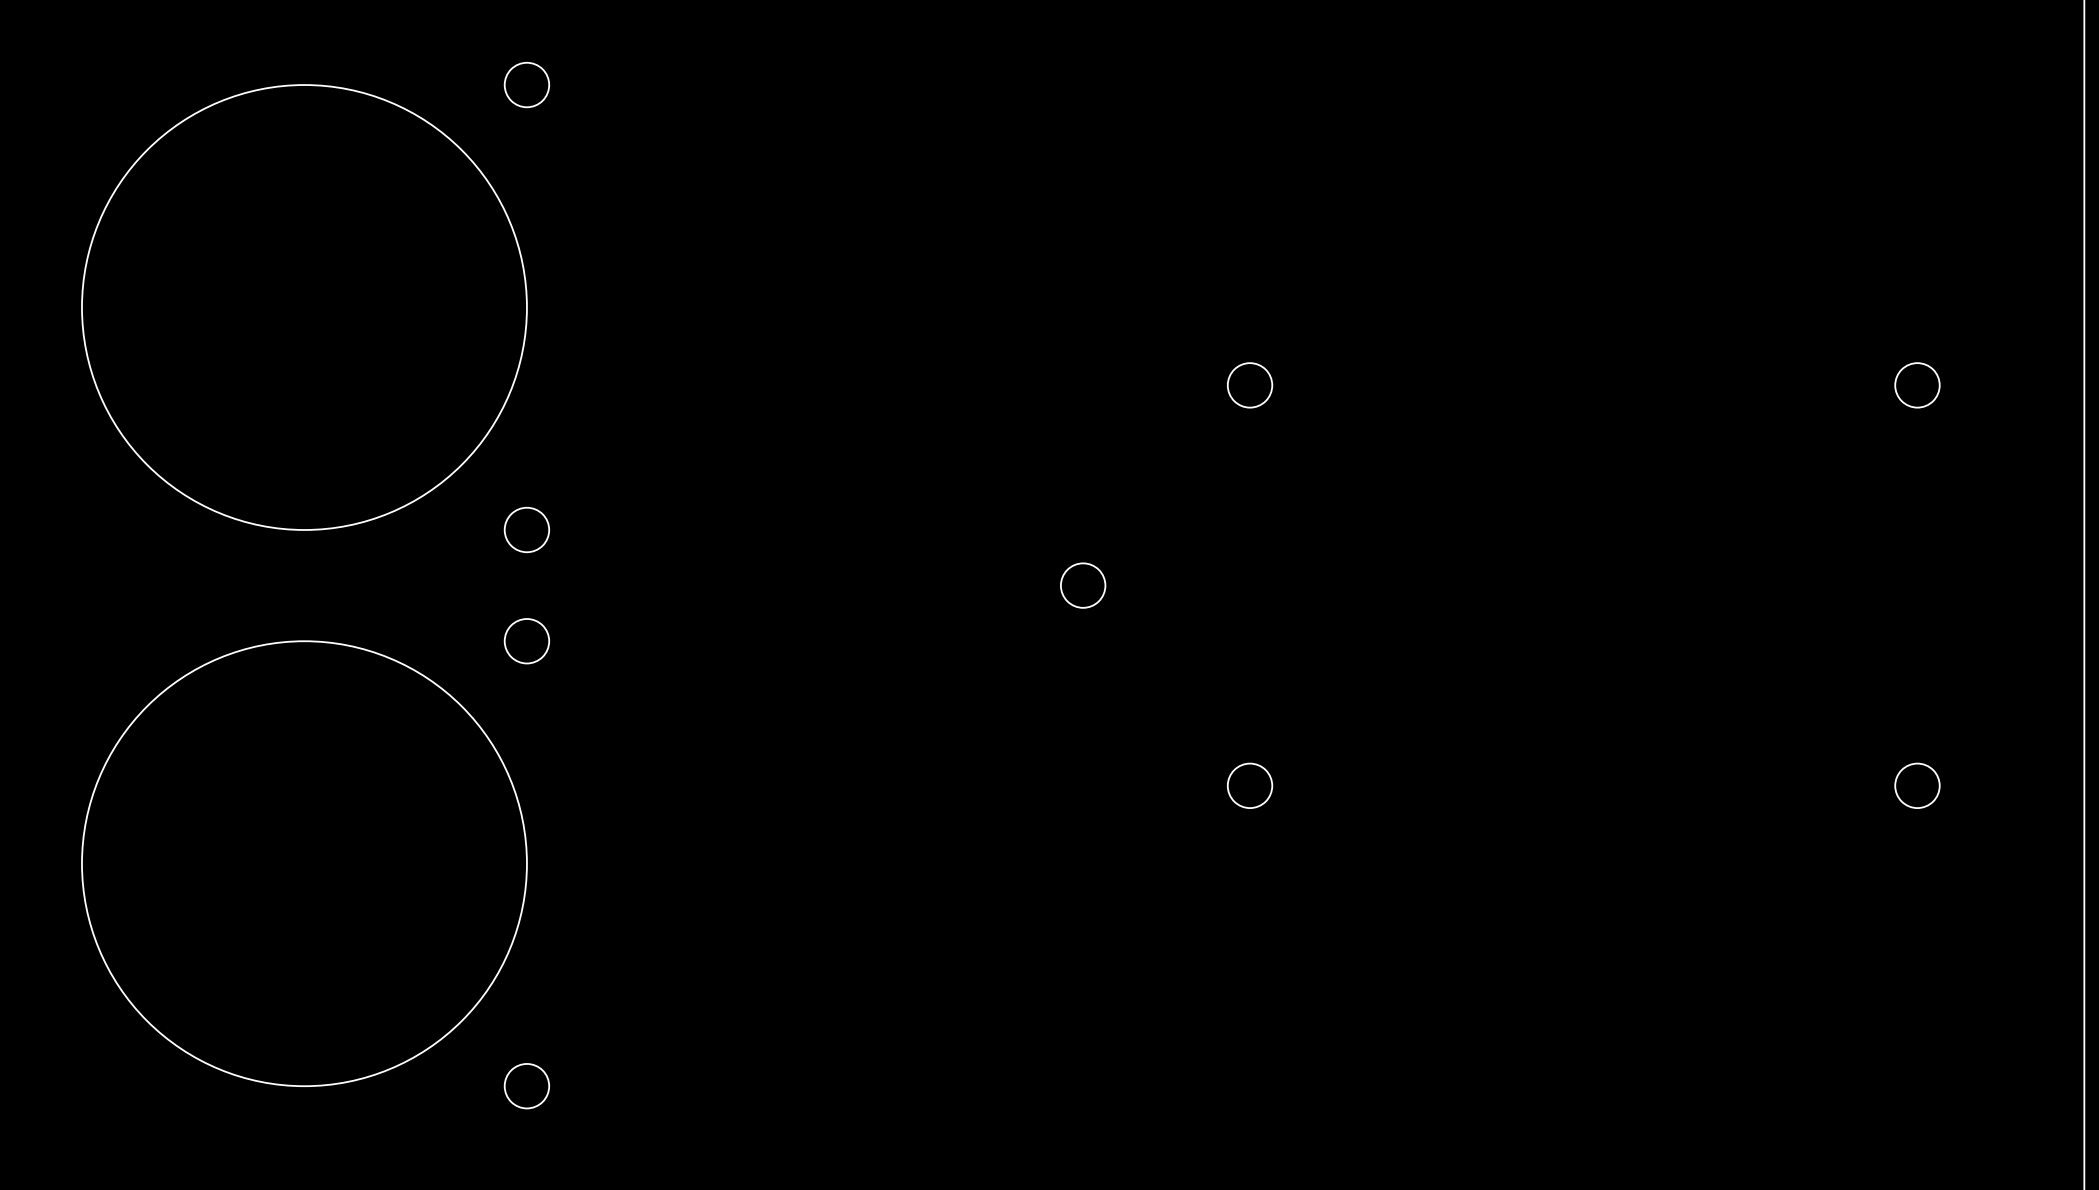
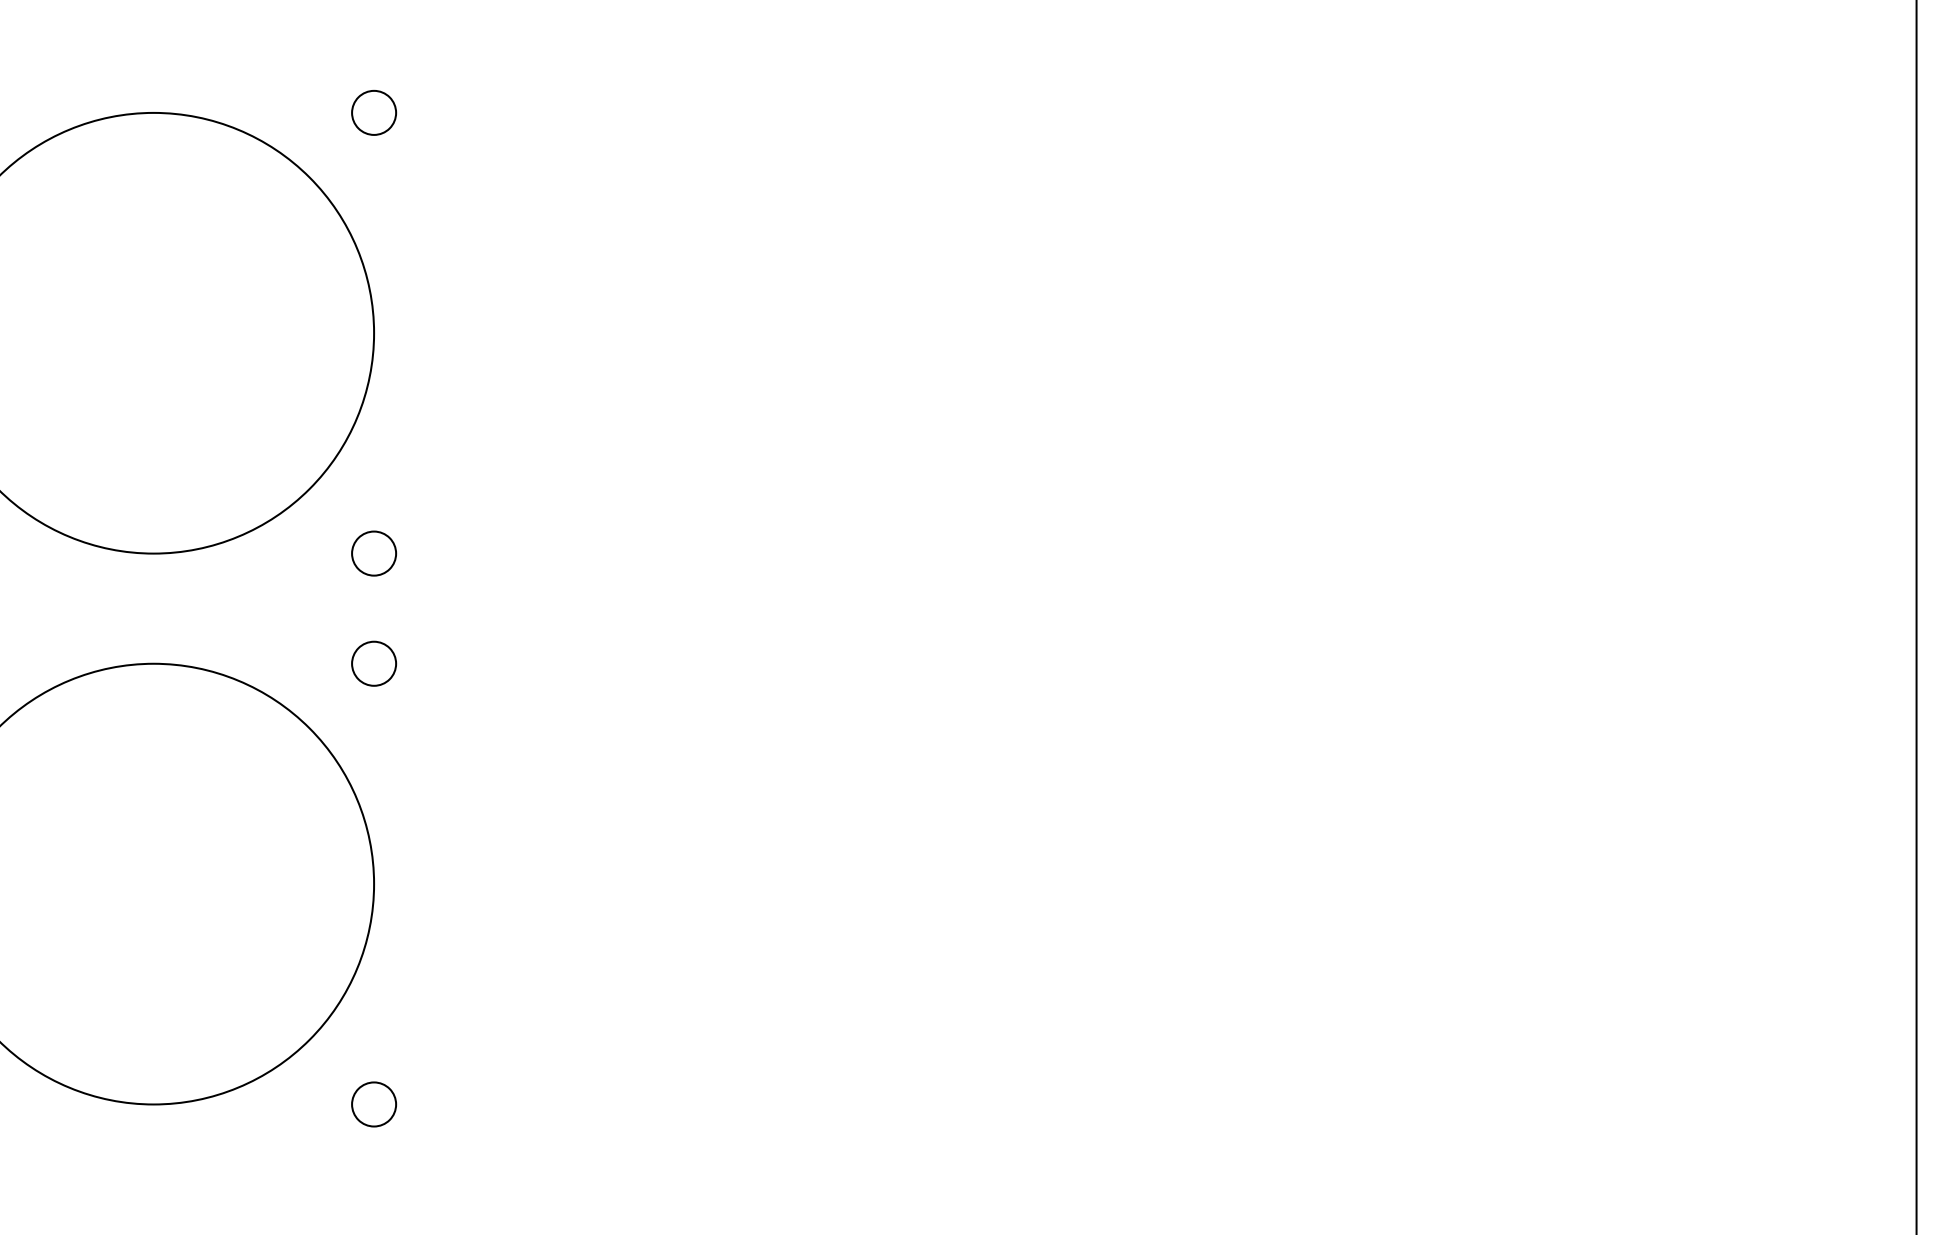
round board edge: [1226, 362, 1274, 409] -> none
round board edge: [1894, 362, 1941, 409] -> none
round board edge: [1060, 562, 1107, 609] -> none
round board edge: [1226, 762, 1274, 809] -> none
round board edge: [1894, 762, 1941, 809] -> none

